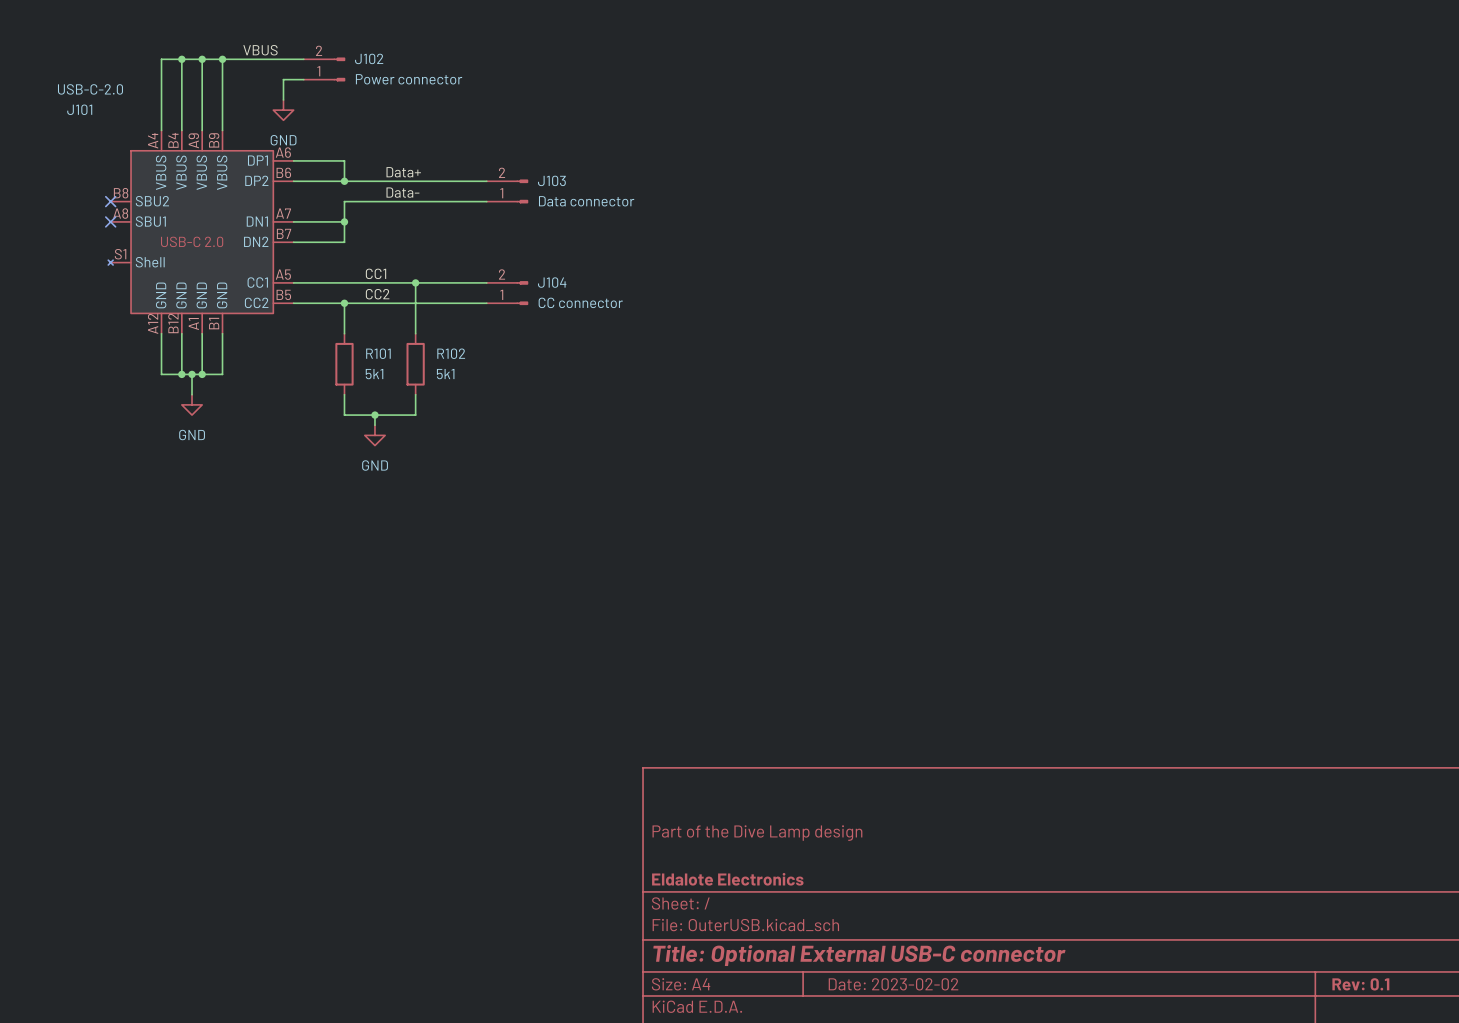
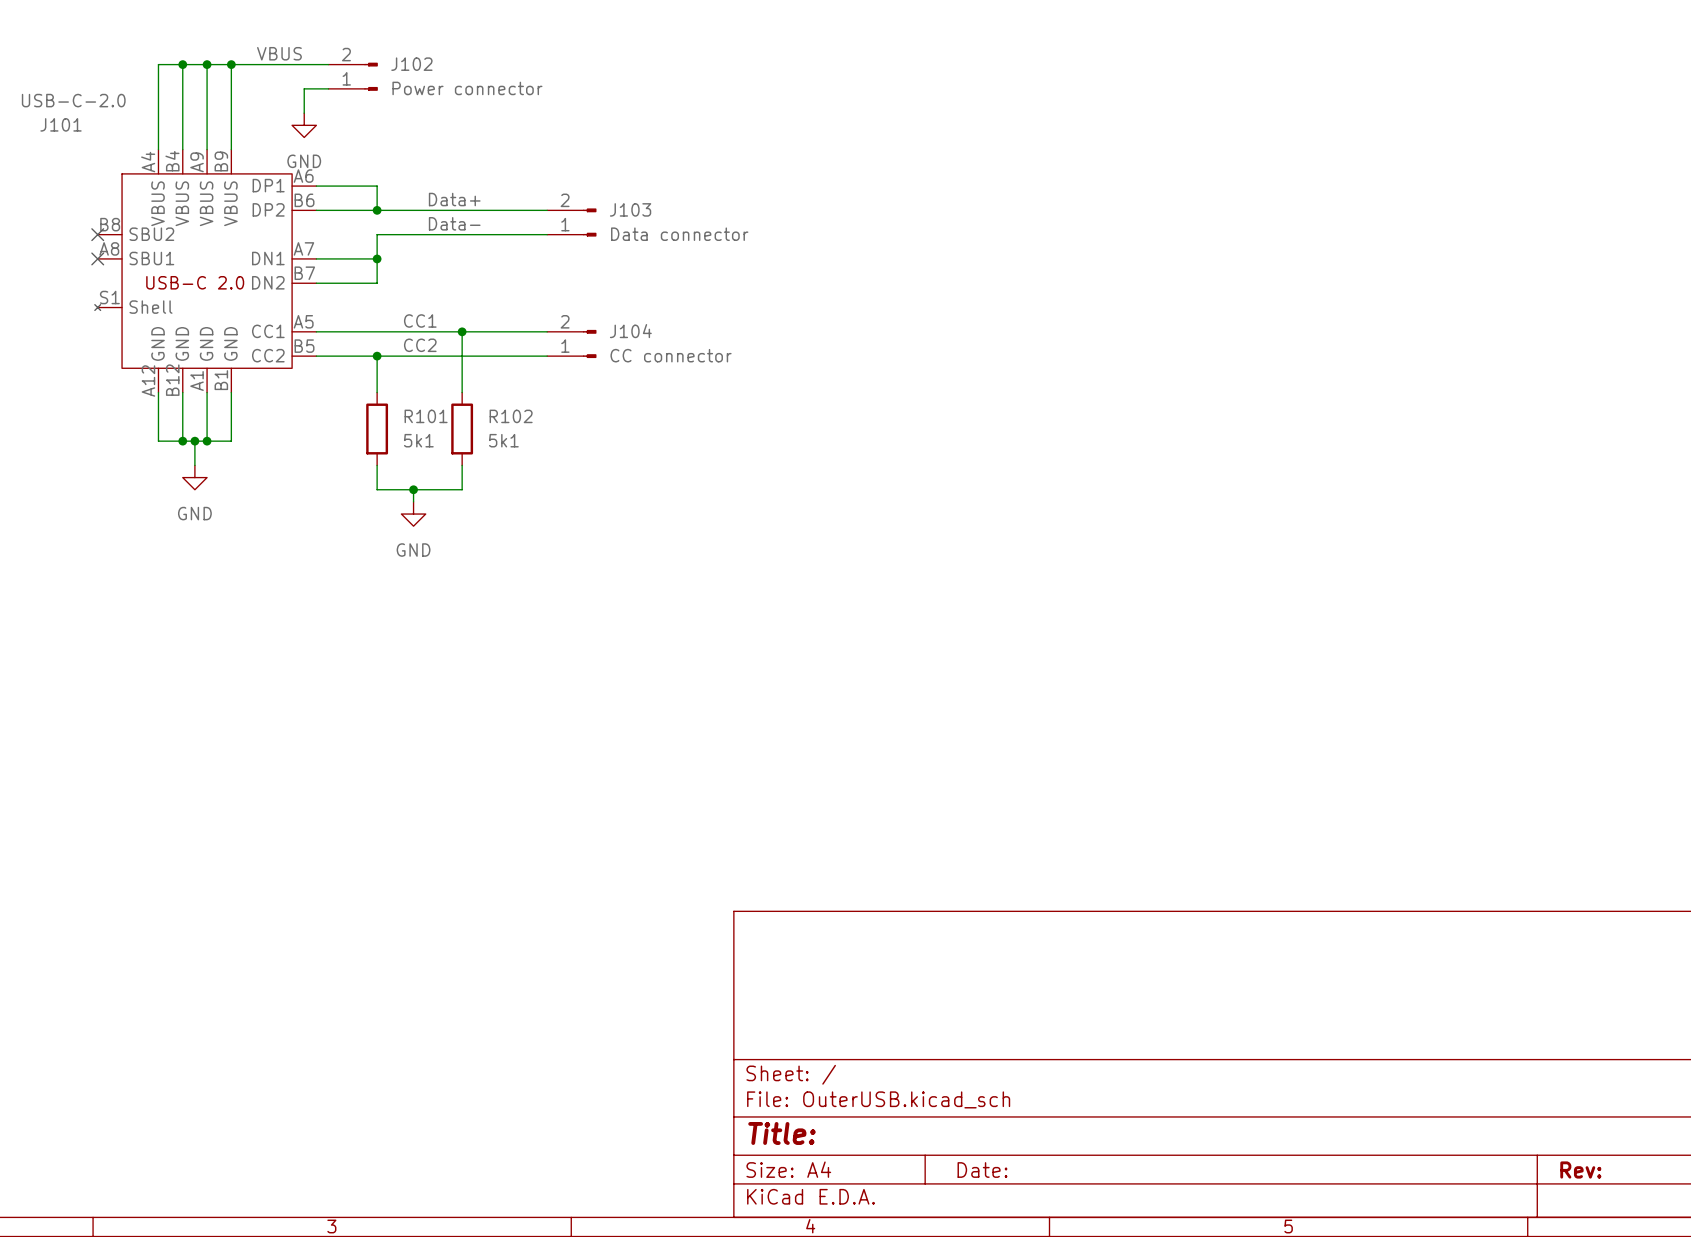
title block: Part of the Dive Lamp design (757, 833) -> none
title block: Eldalote Electronics (727, 879) -> none
title block: Title: Optional External USB-C connector (859, 955) -> Title: (781, 1133)
title block: Date: 2023-02-02 (893, 984) -> Date: (982, 1170)
title block: Rev: 0.1 (1360, 984) -> Rev: (1580, 1170)

